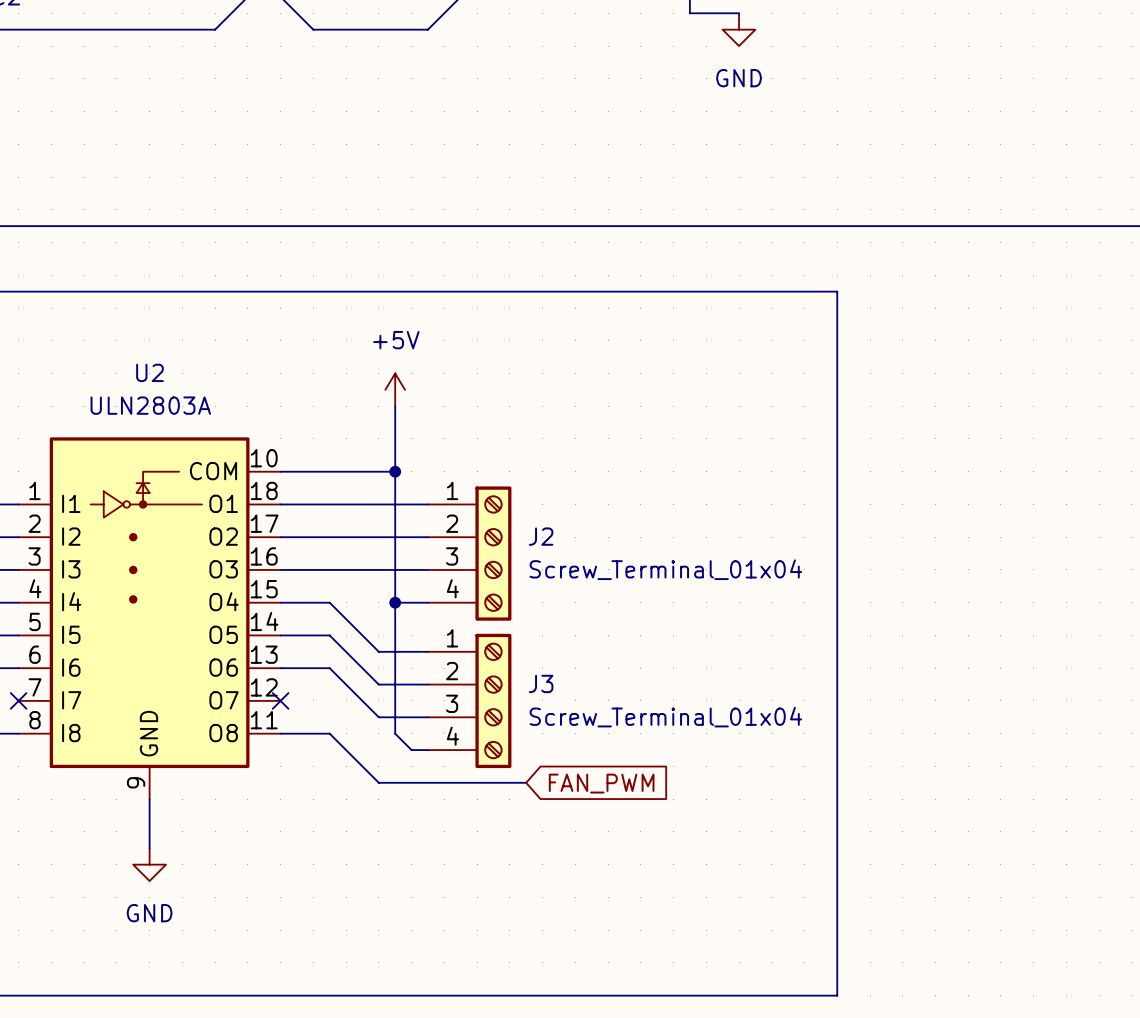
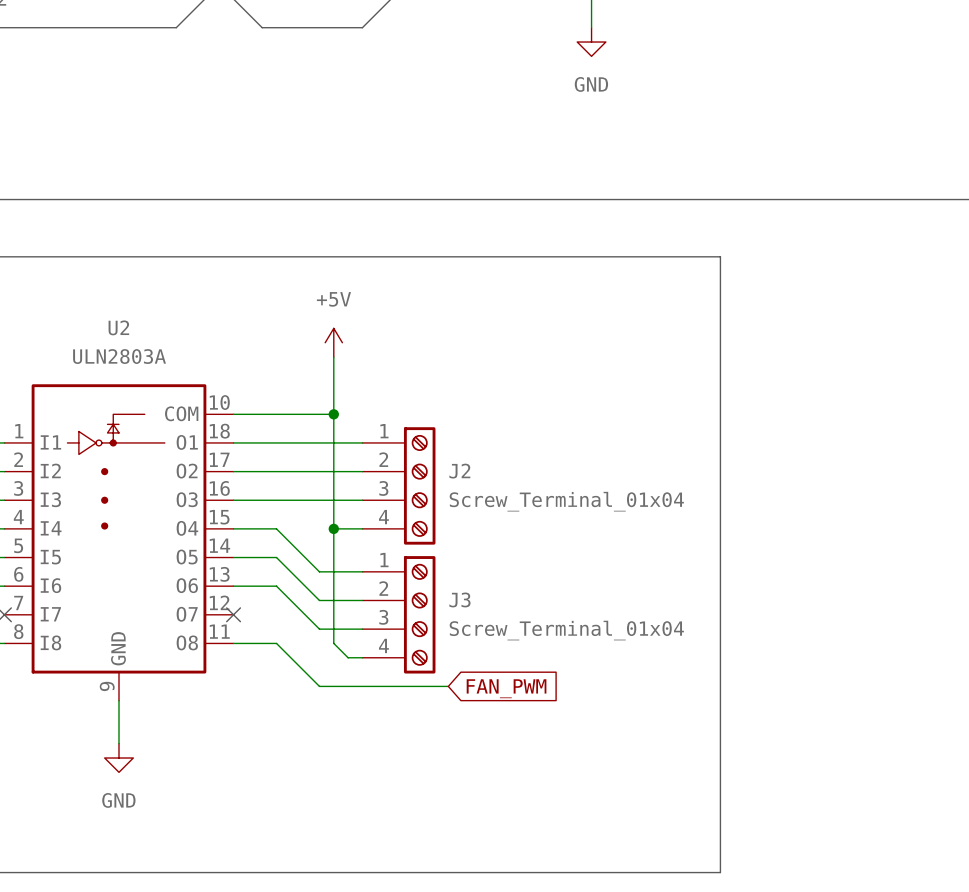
wire: (689, 13) (739, 13) -> (591, 13) (591, 27)
power symbol position: GND (739, 29) -> GND (591, 42)

